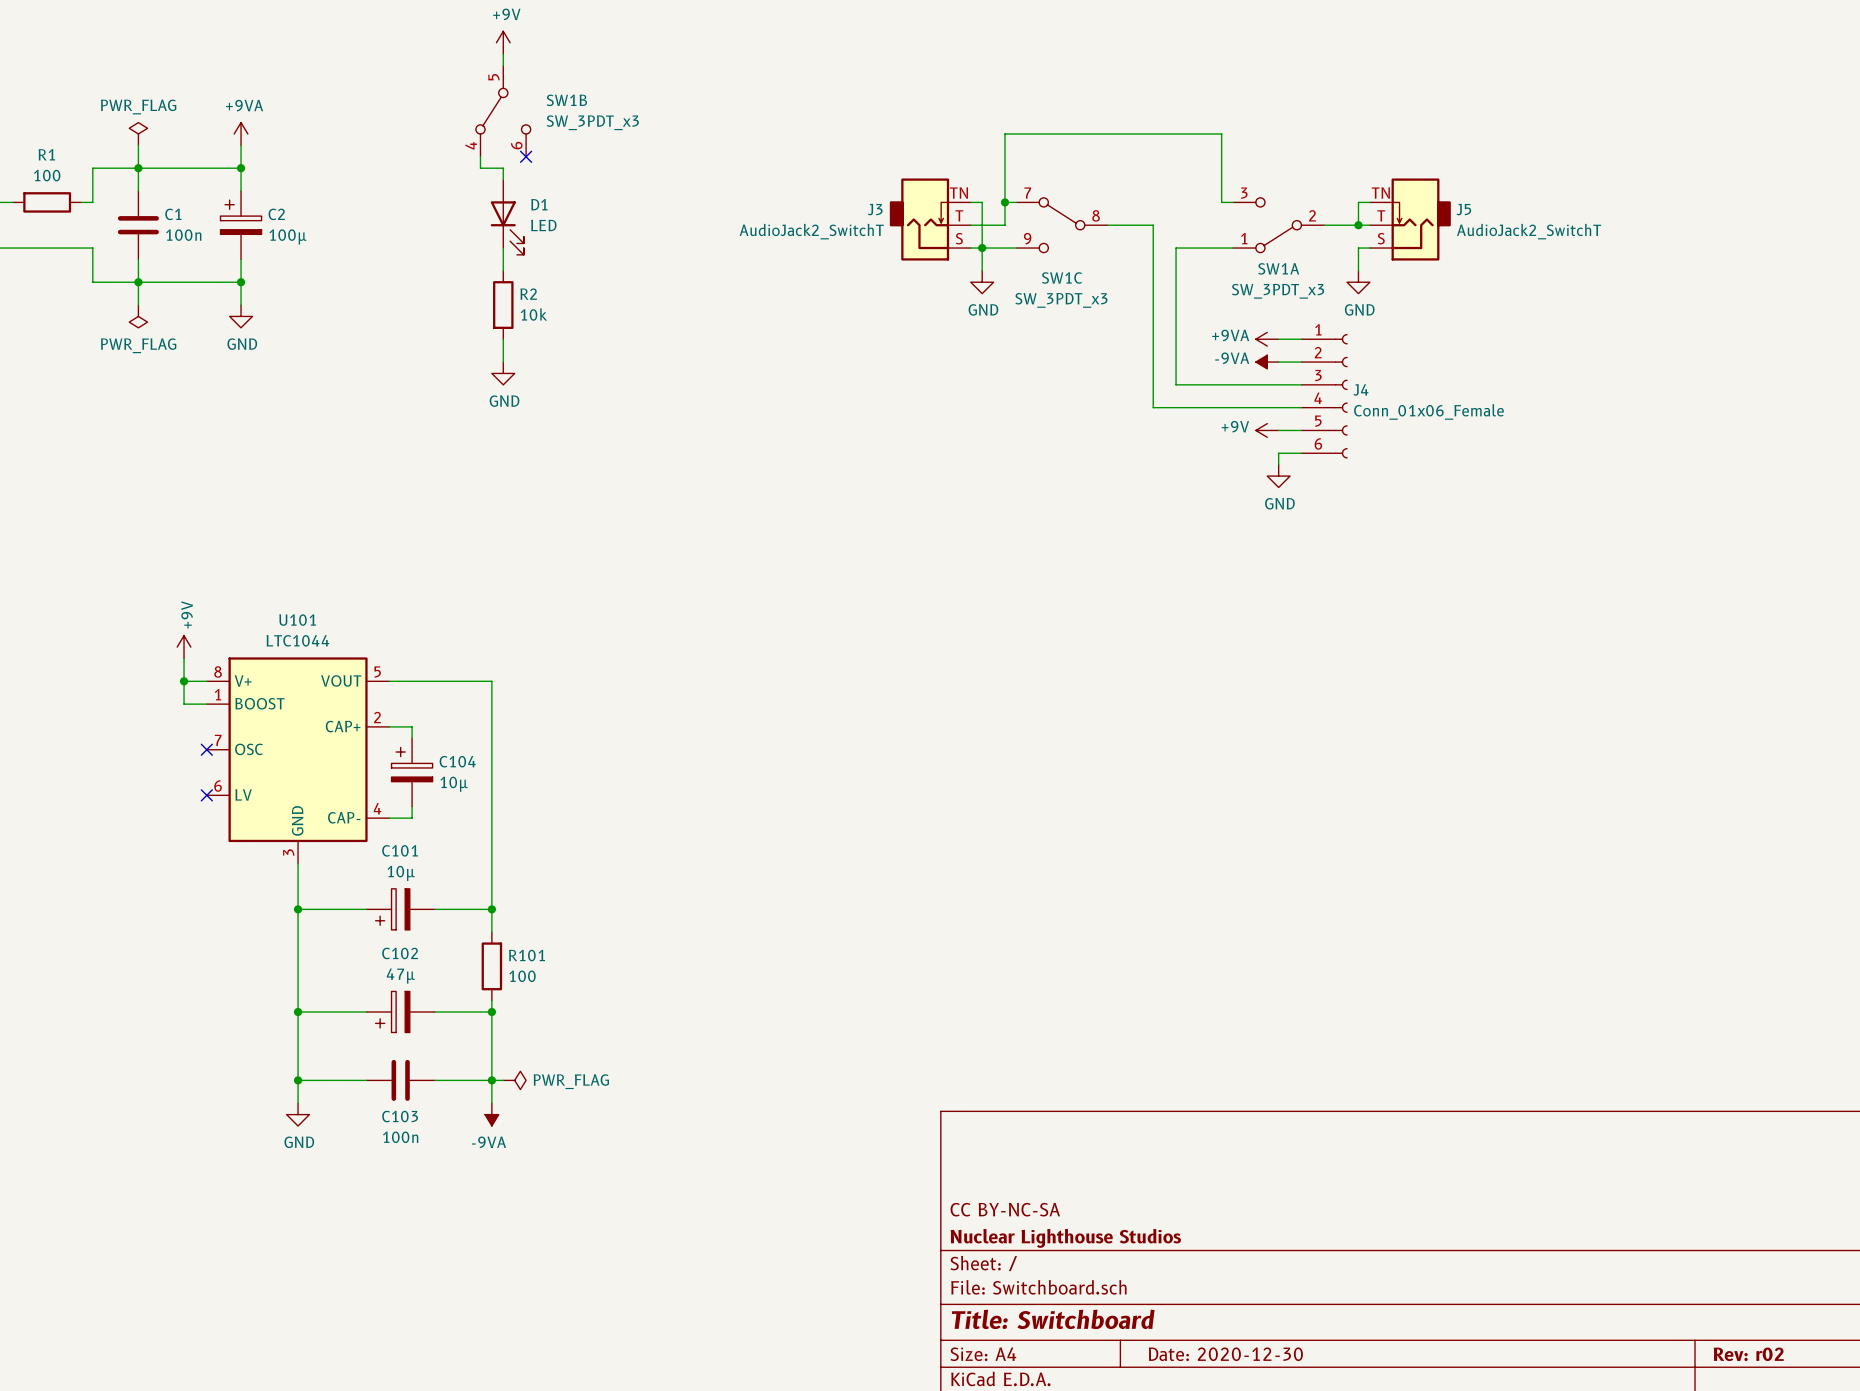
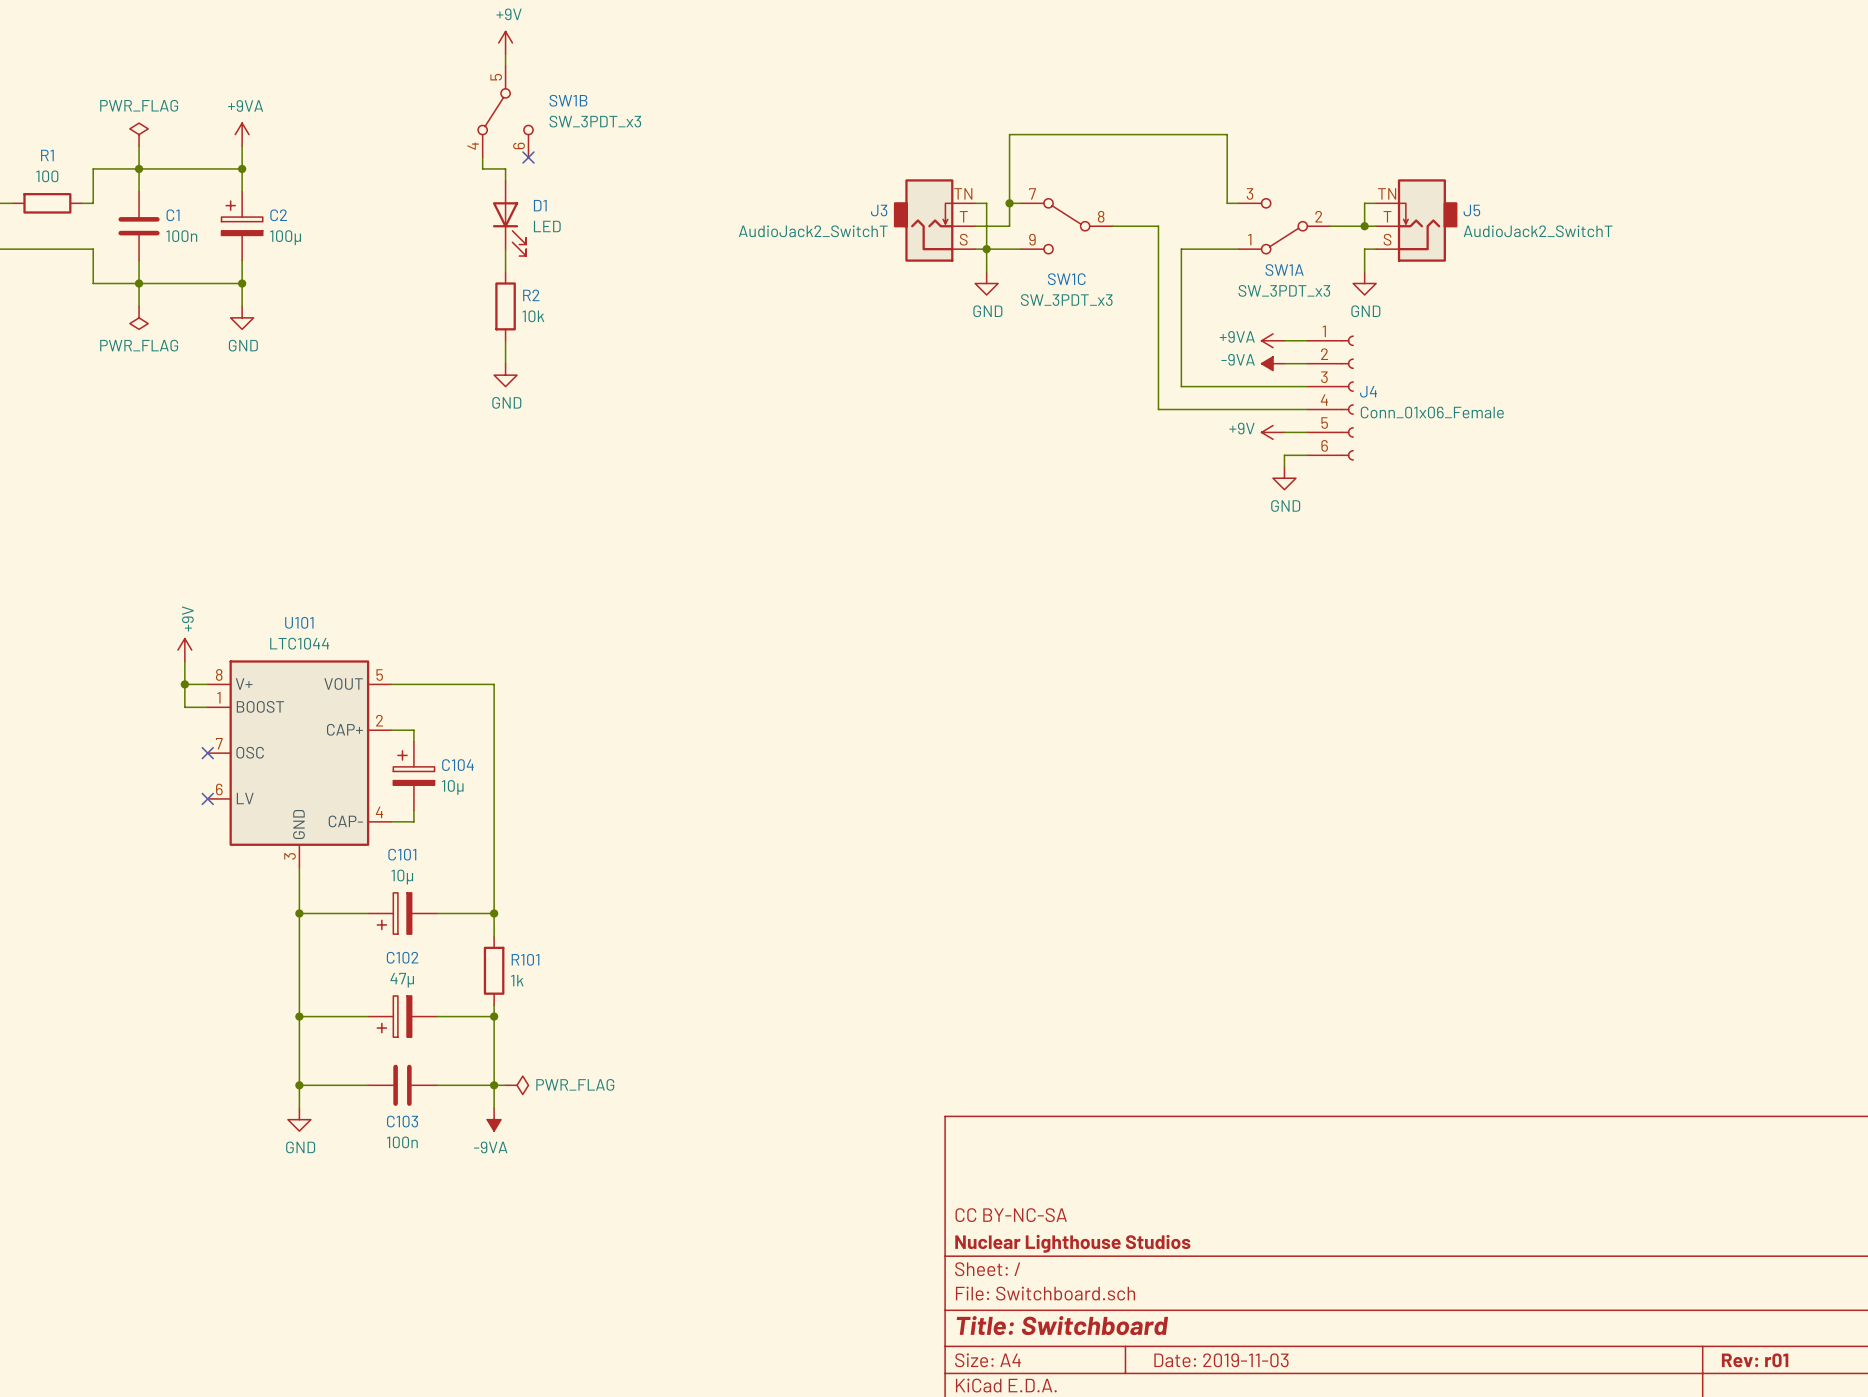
R101 value: 100 (522, 976) -> 1k (517, 980)
title block: Date: 2020-12-30 (1225, 1354) -> Date: 2019-11-03 (1221, 1360)
title block: Rev: r02 (1748, 1354) -> Rev: r01 (1755, 1360)

